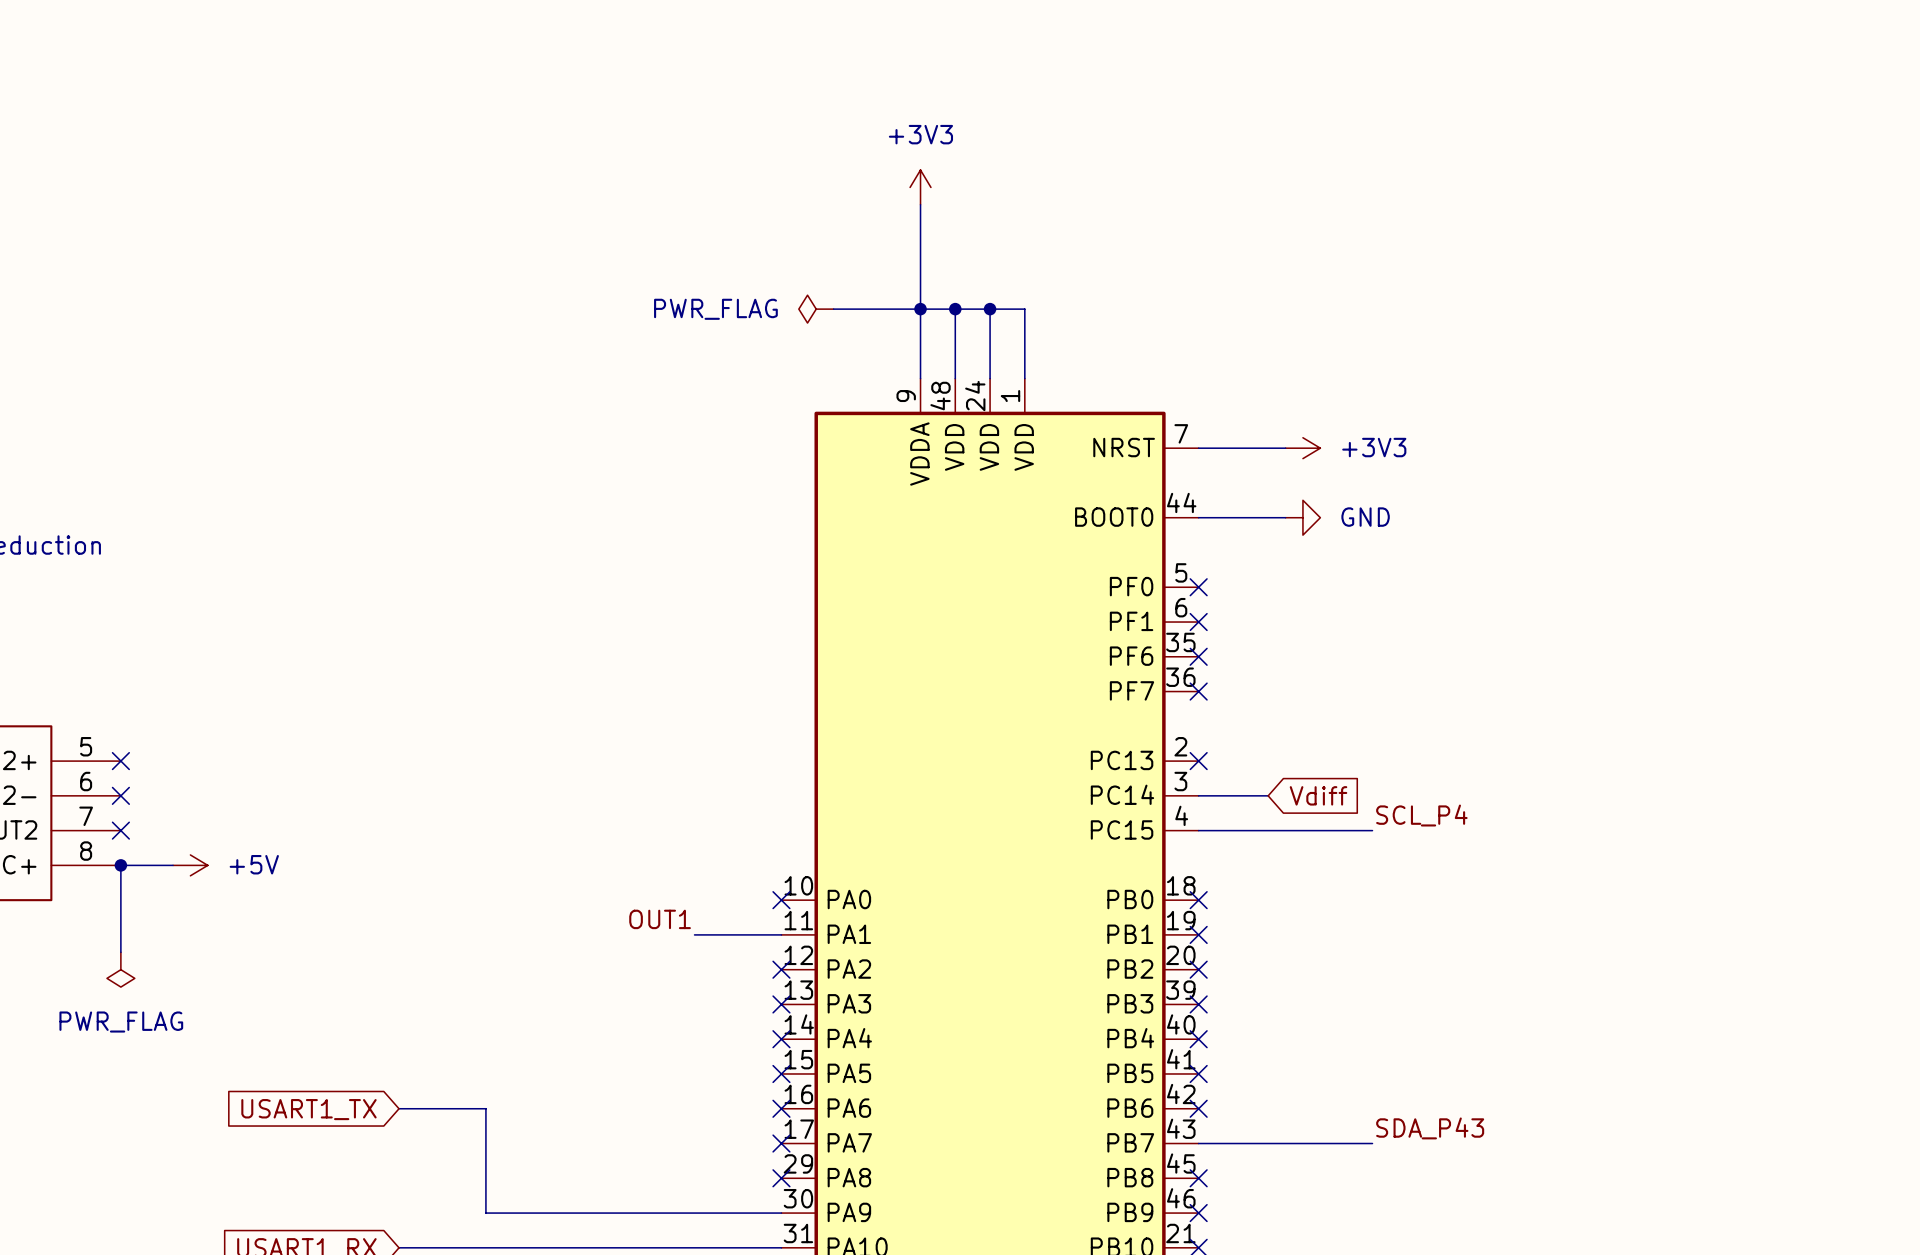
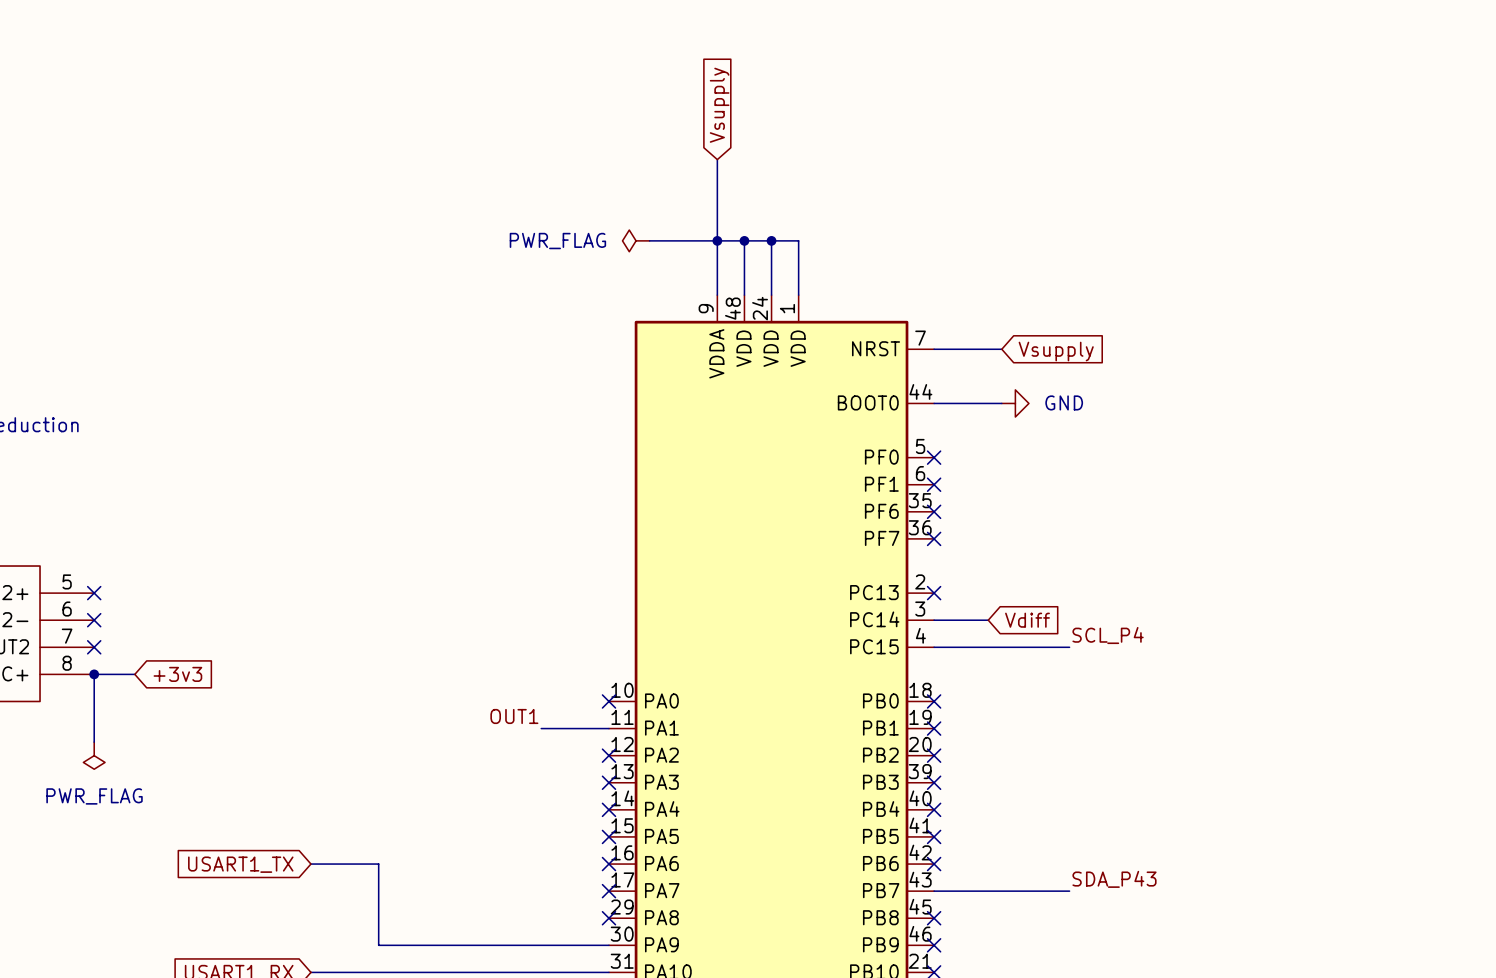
global label: none -> Vsupply (719, 105)
power symbol: +3V3 (920, 187) -> none
power symbol: +3V3 (1302, 448) -> none
global label: none -> Vsupply (1056, 351)
power symbol: +5V (190, 865) -> none
global label: none -> +3v3 (177, 674)

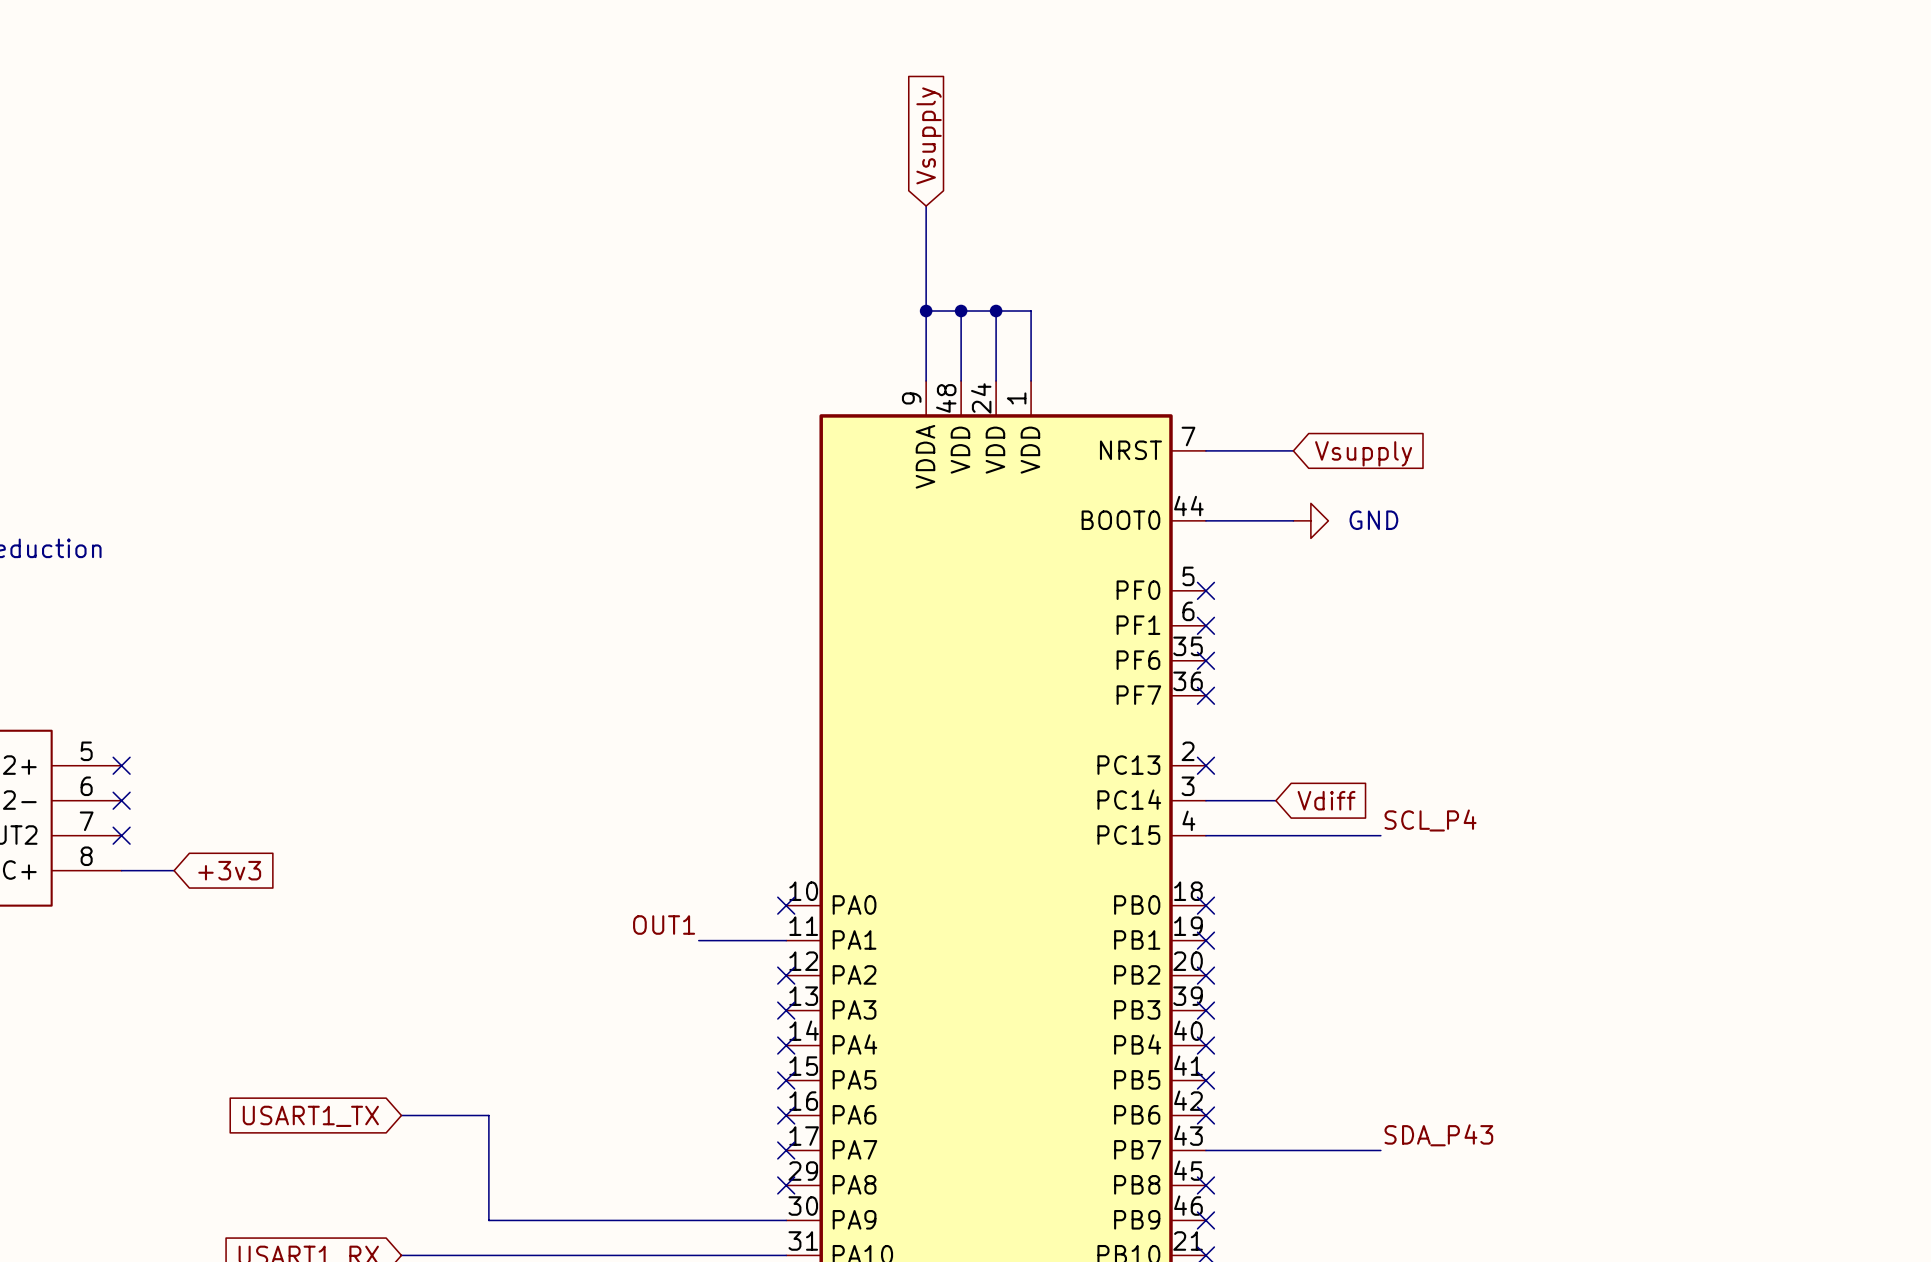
power symbol: PWR_FLAG (636, 240) -> none
wire: (649, 240) (717, 240) -> none
wire: (94, 674) (94, 742) -> none
junction: (94, 674) -> none
power symbol: PWR_FLAG (94, 755) -> none

